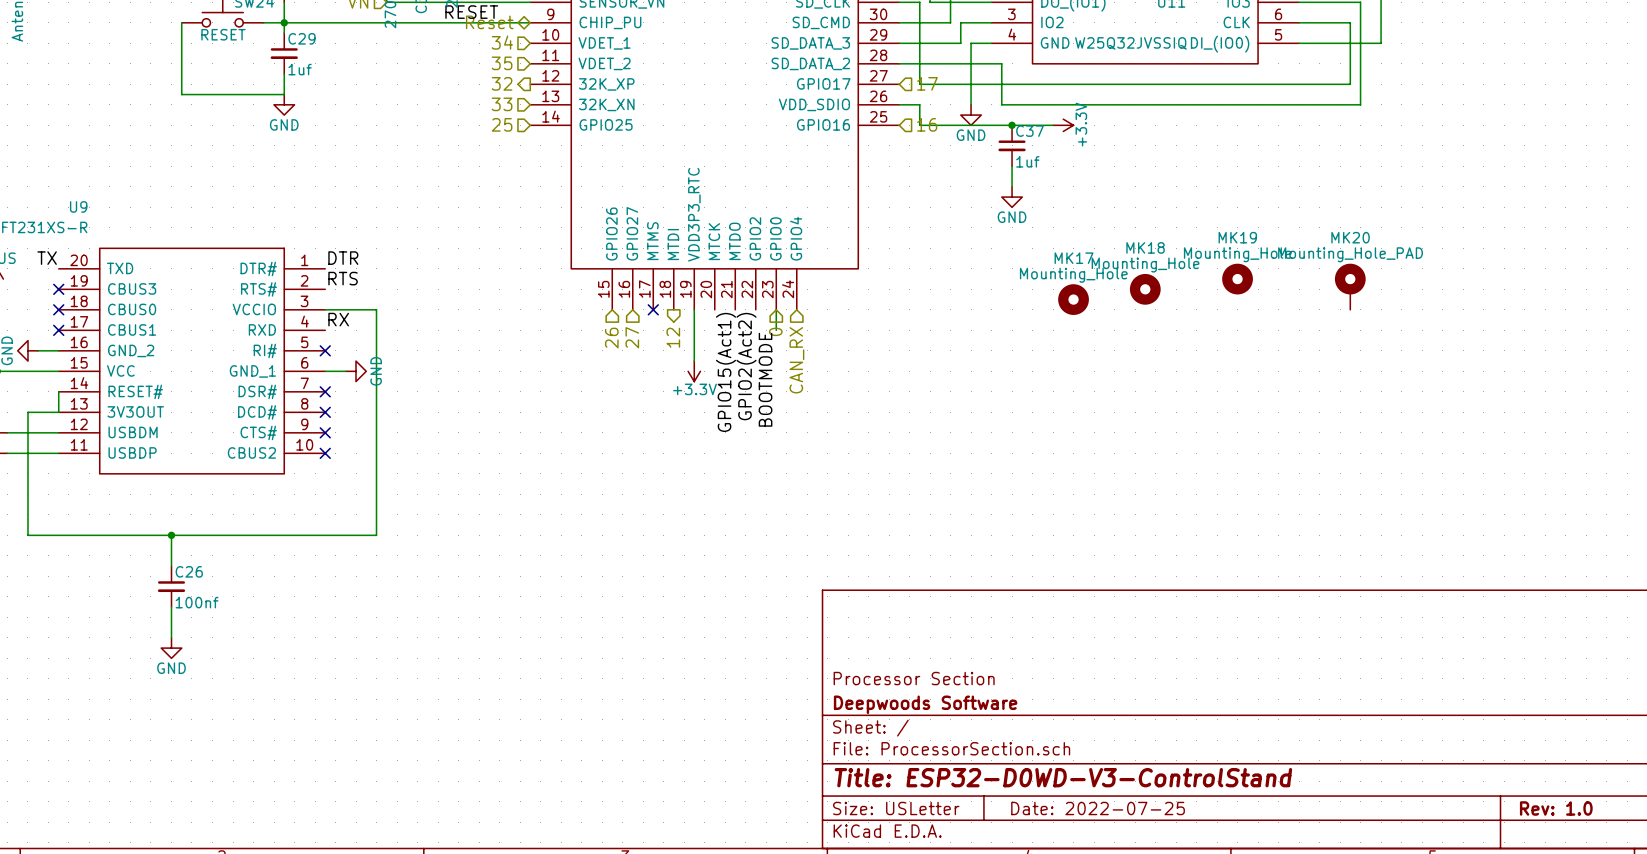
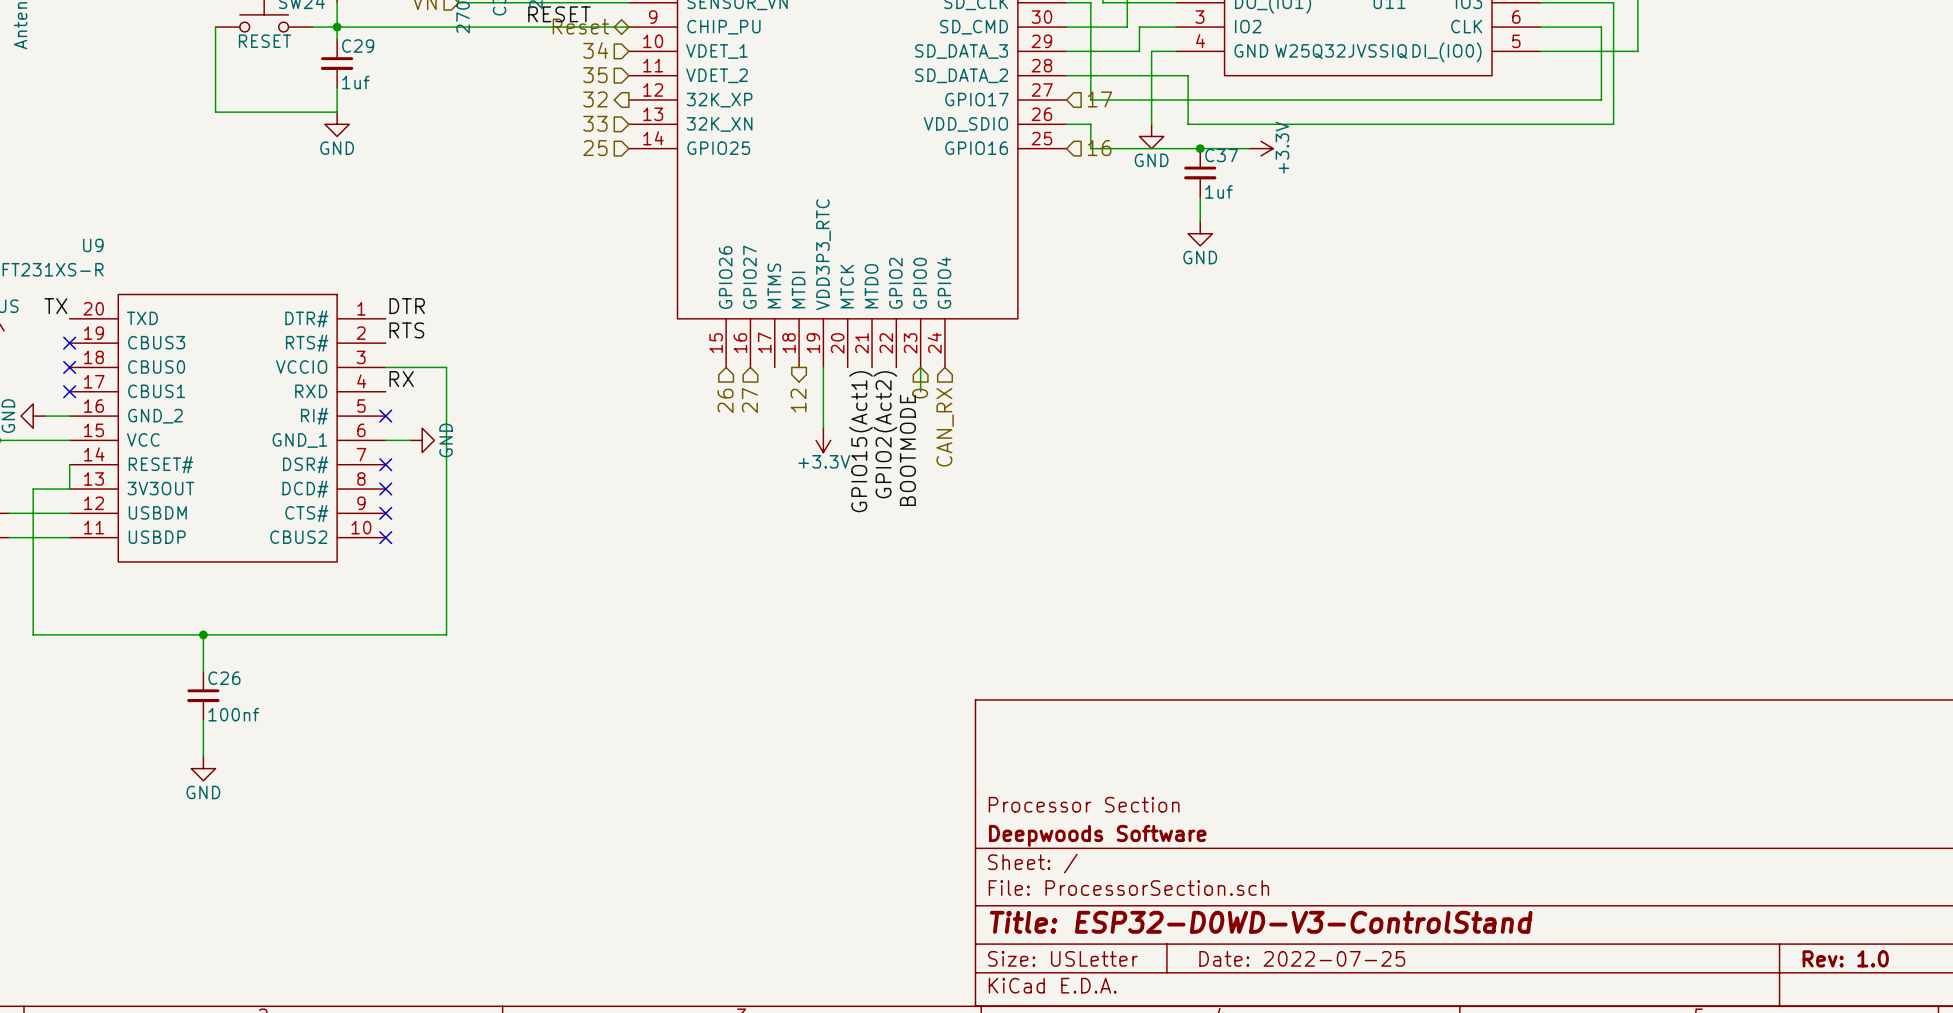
MK19: Mounting_Hole (1237, 279) -> none
MK20: Mounting_Hole_PAD (1350, 286) -> none
MK18: Mounting_Hole (1145, 289) -> none
MK17: Mounting_Hole (1073, 299) -> none
no-connect mark: (653, 309) -> none

